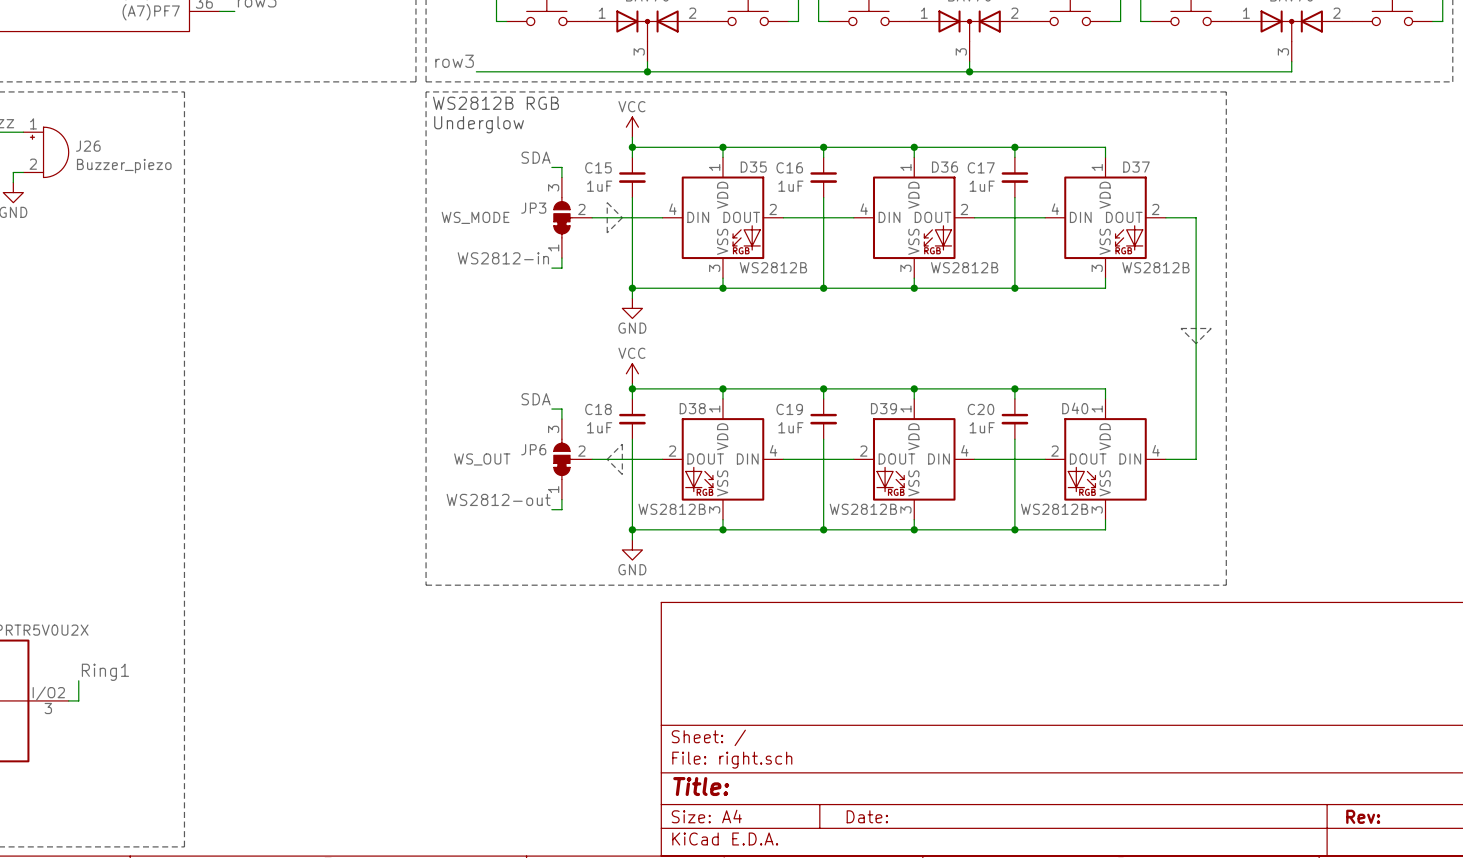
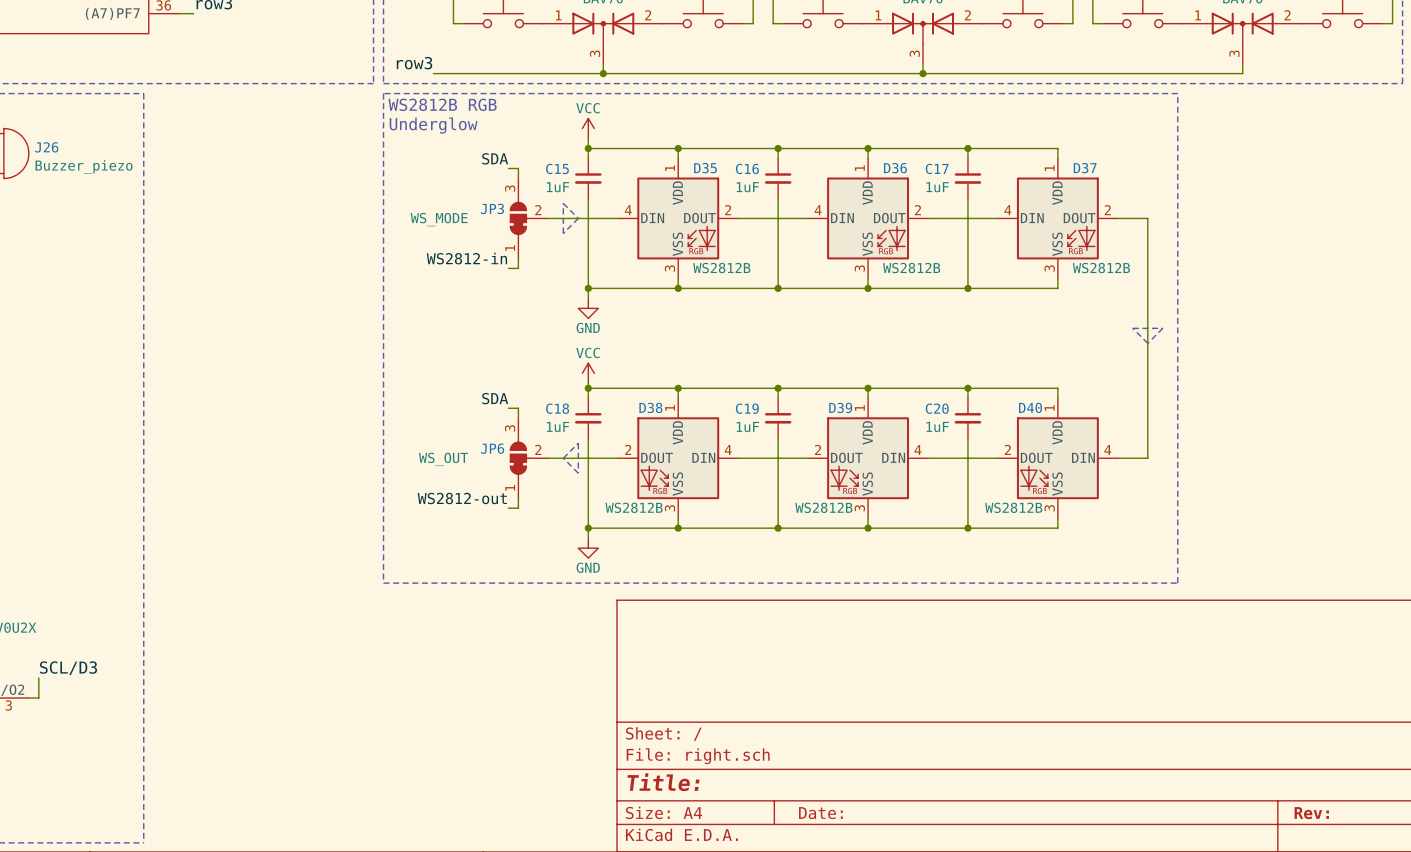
label: Ring1 (105, 672) -> SCL/D3 (68, 668)

